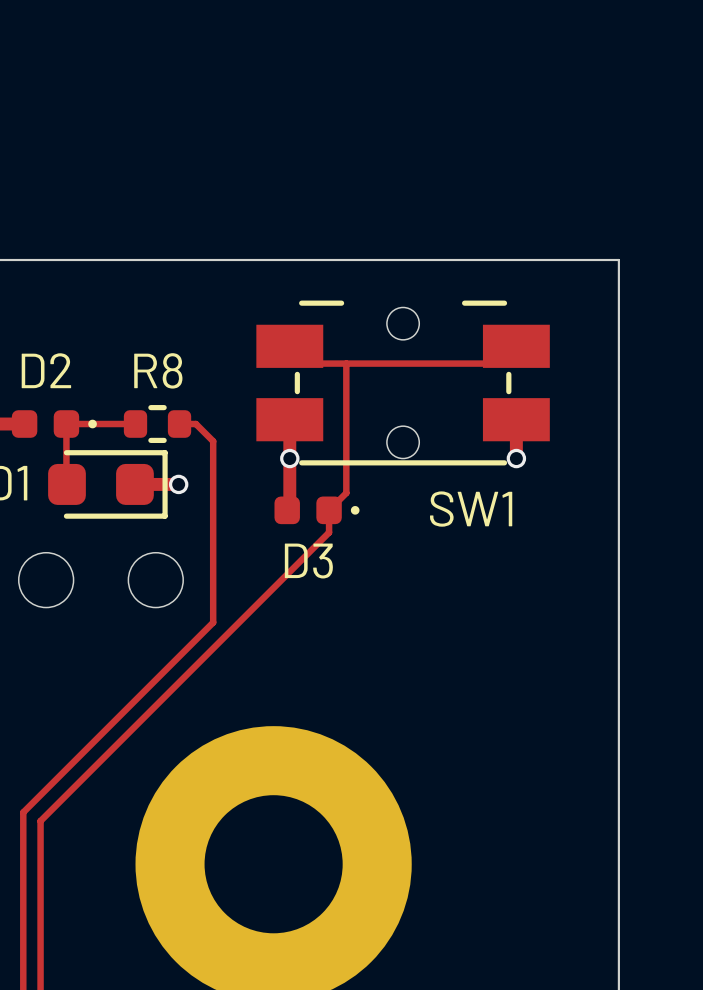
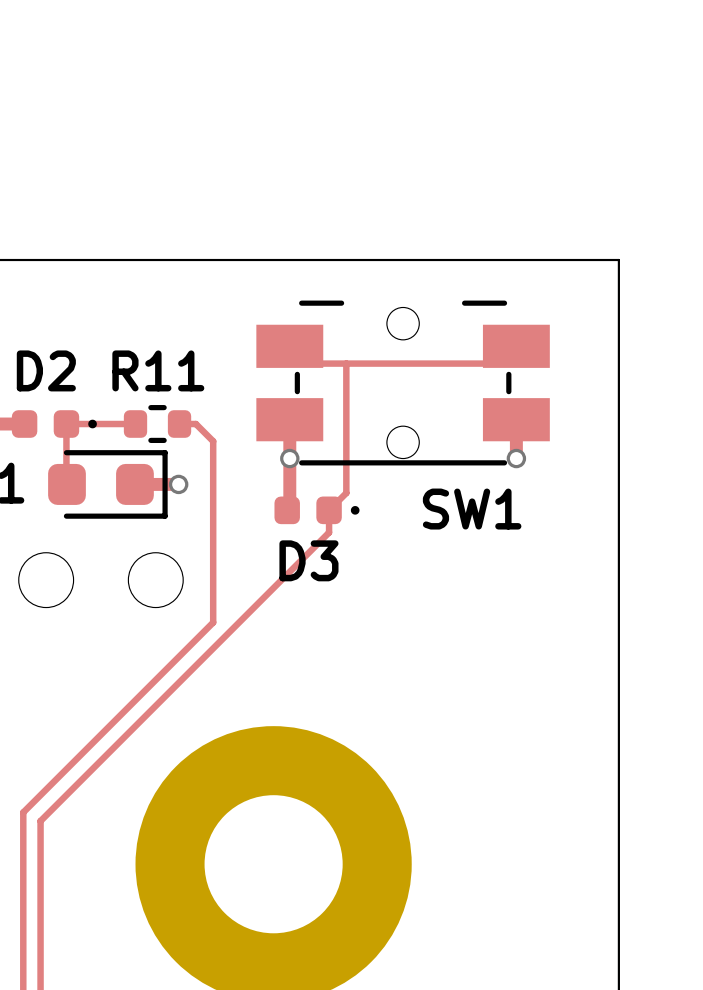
R8 name: R8 (158, 370) -> R11 (158, 370)

